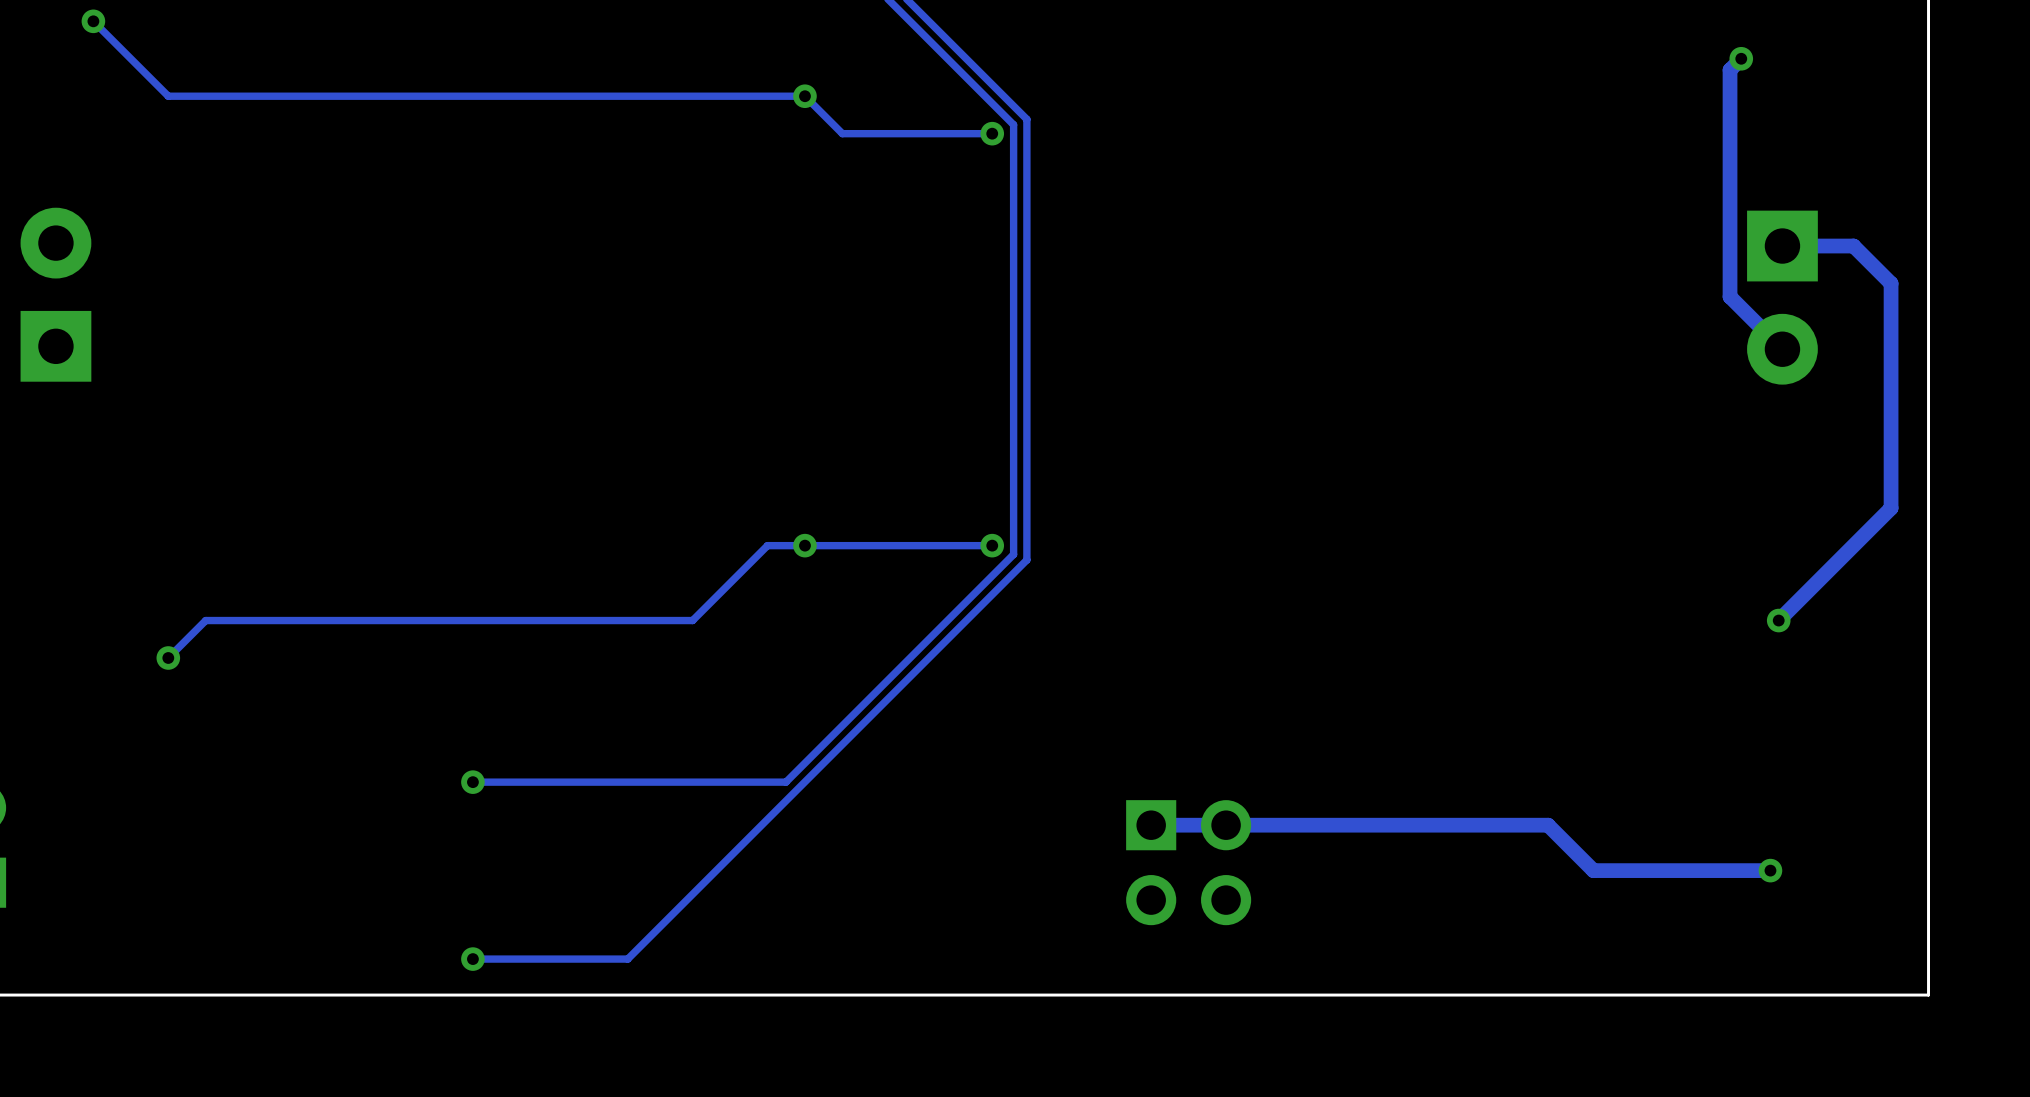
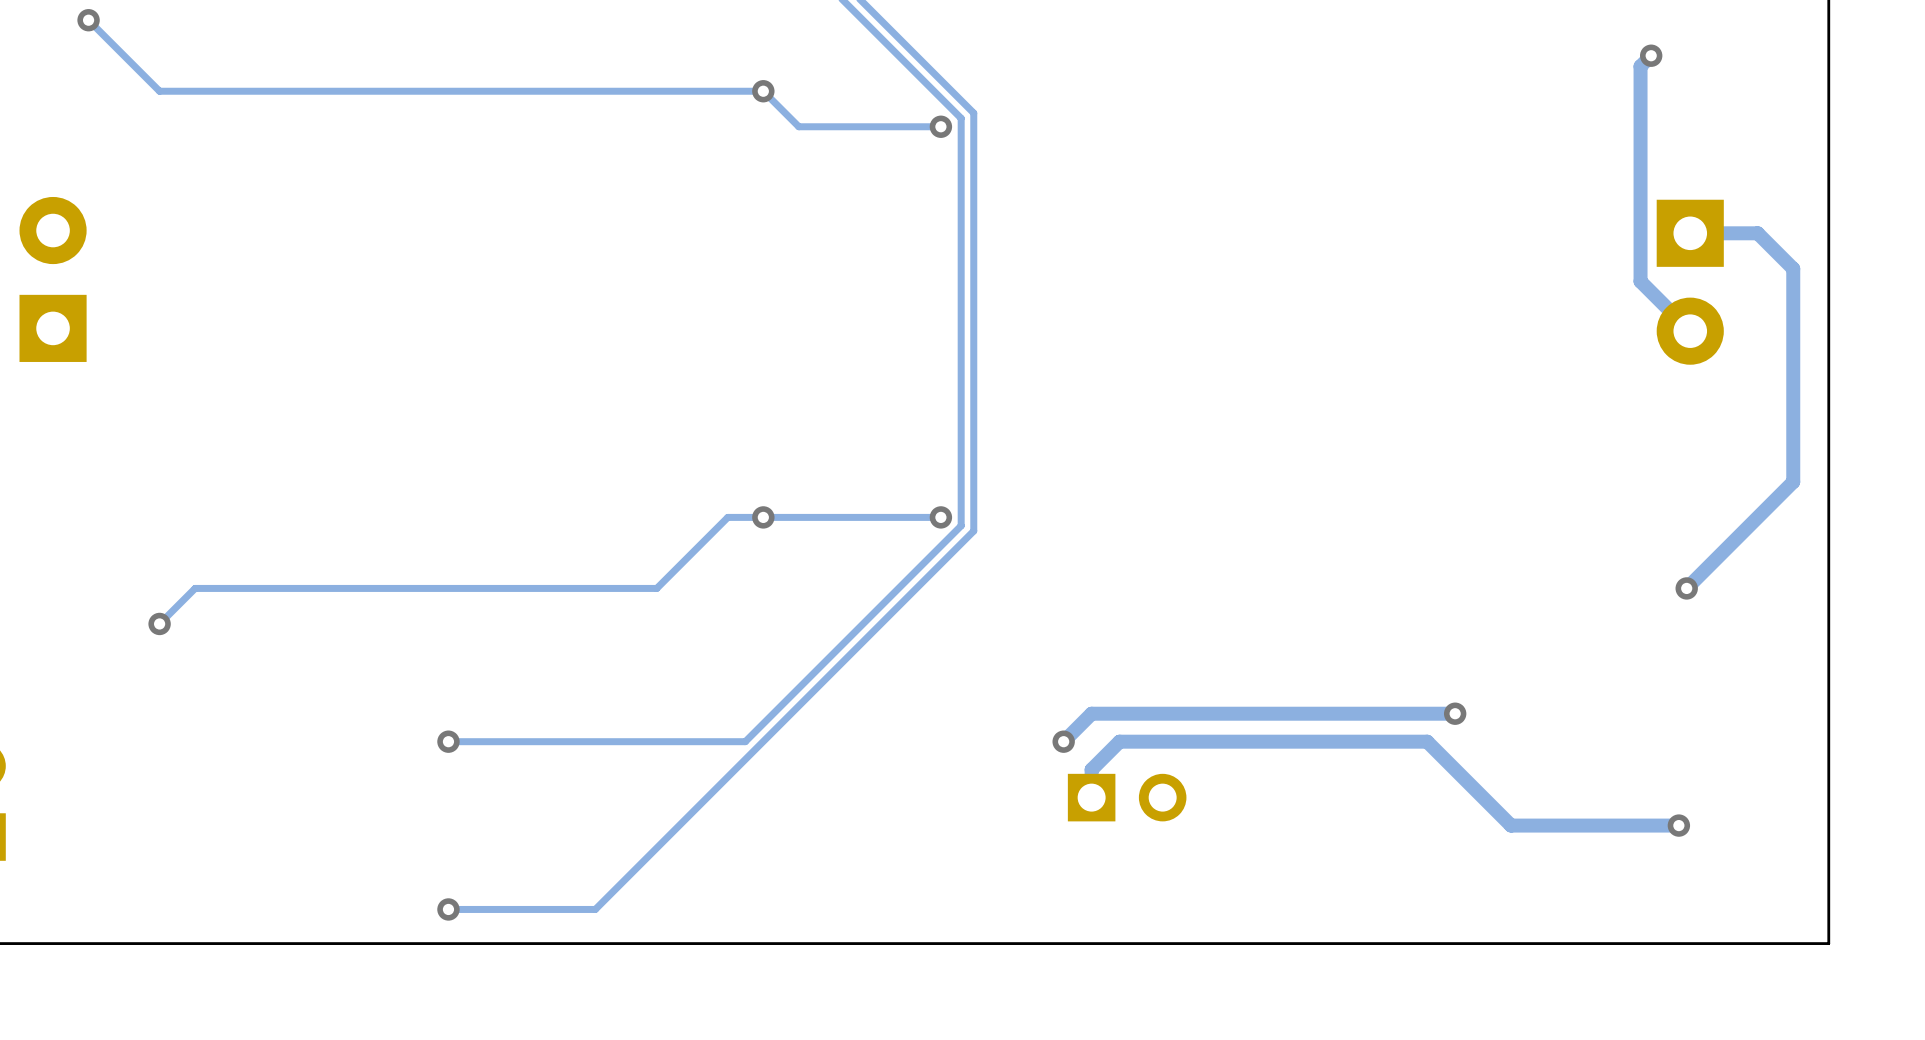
track: none -> (1455, 713) (1091, 713) (1063, 741)
via: none -> (1455, 713)
via: none -> (1063, 741)
part footprint: [1126, 800, 1252, 926] -> [1067, 773, 1187, 822]
track: (1548, 825) (1151, 825) -> (1468, 782) (1427, 741) (1119, 741) (1091, 769) (1091, 797)

